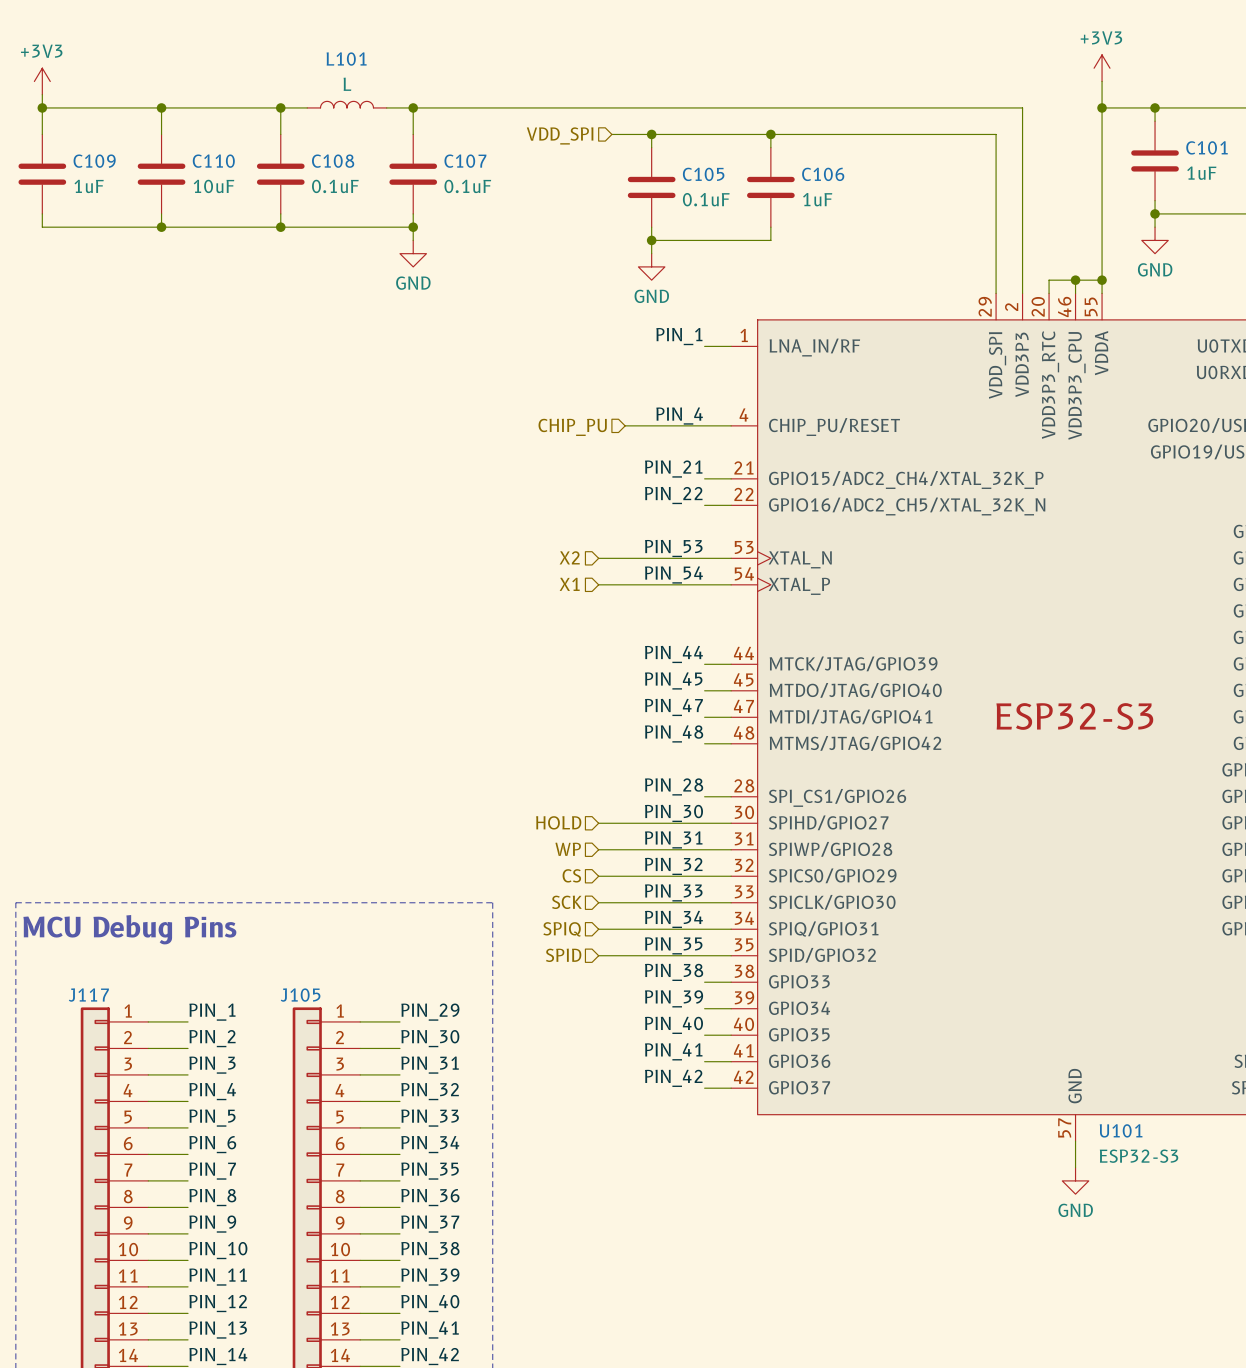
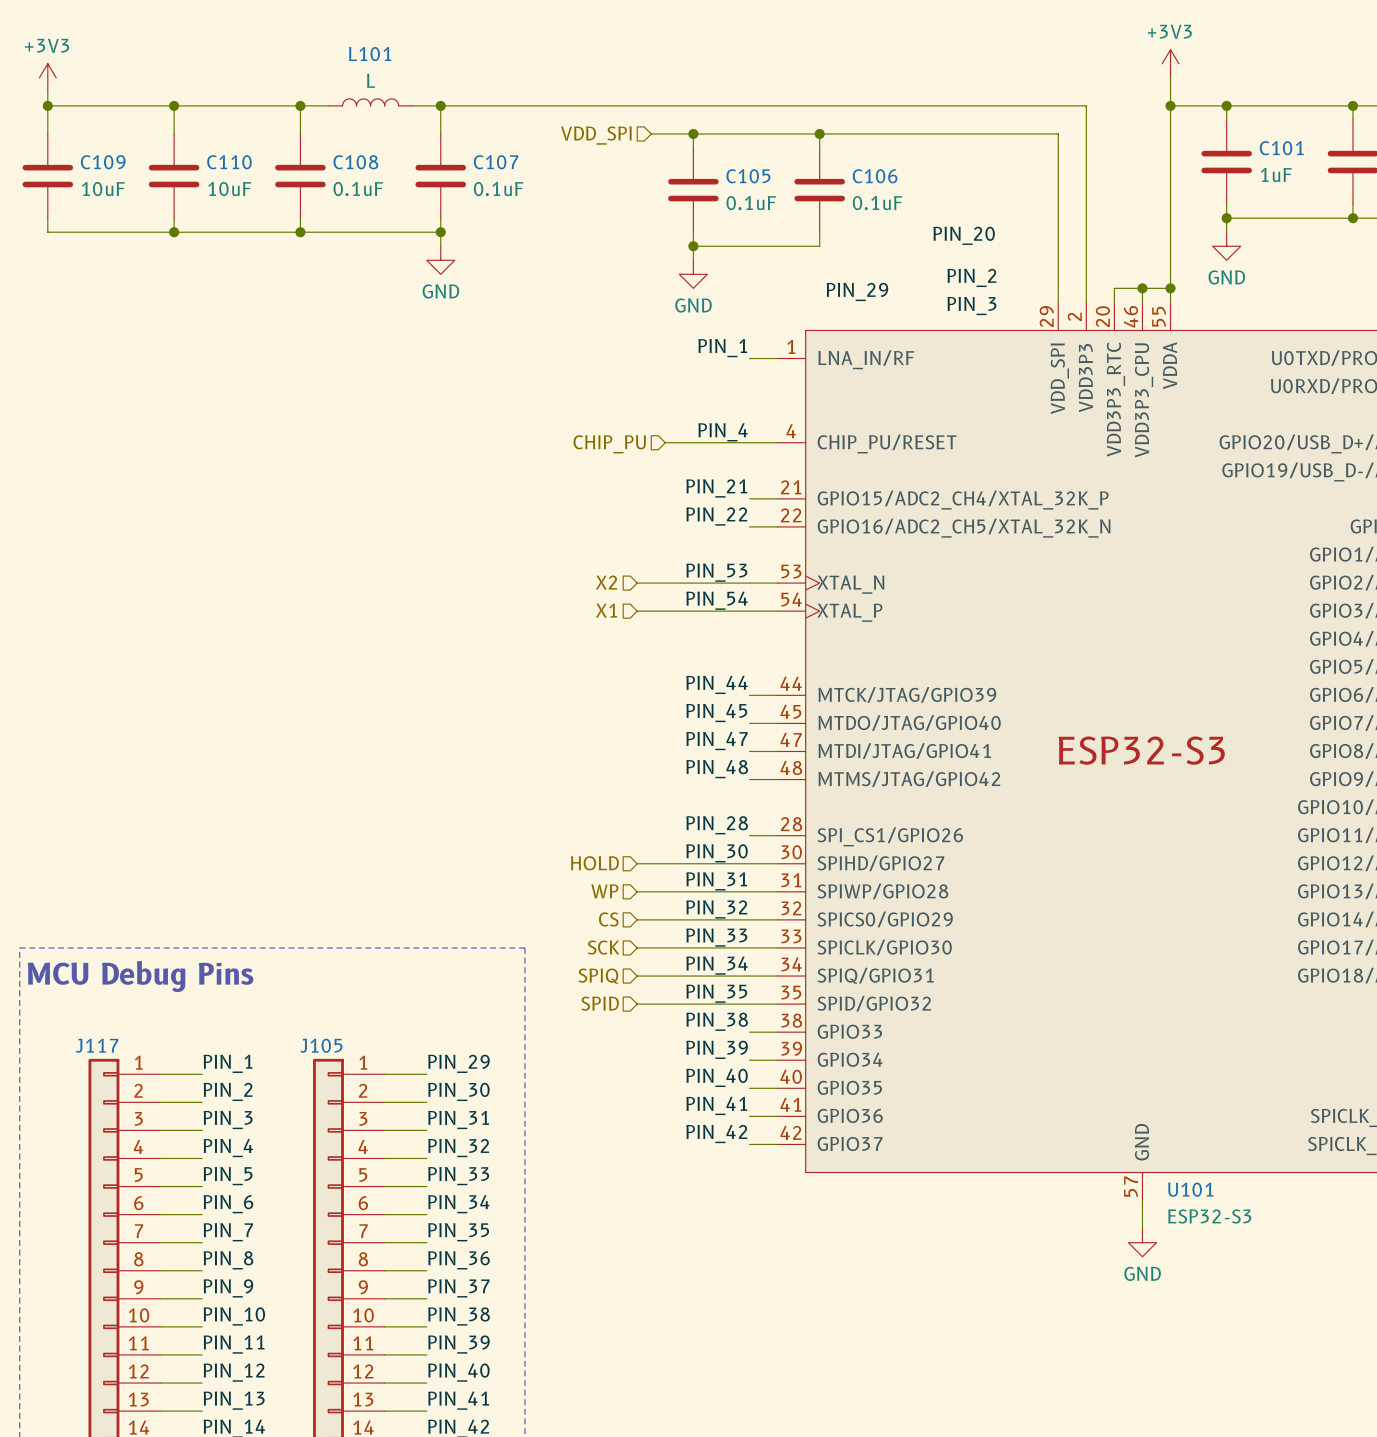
C109 value: 1uF (89, 186) -> 10uF (103, 189)
C106 value: 1uF (817, 199) -> 0.1uF (877, 203)
label: none -> PIN_20 (964, 235)
label: none -> PIN_2 (971, 277)
label: none -> PIN_29 (857, 291)
label: none -> PIN_3 (971, 306)

